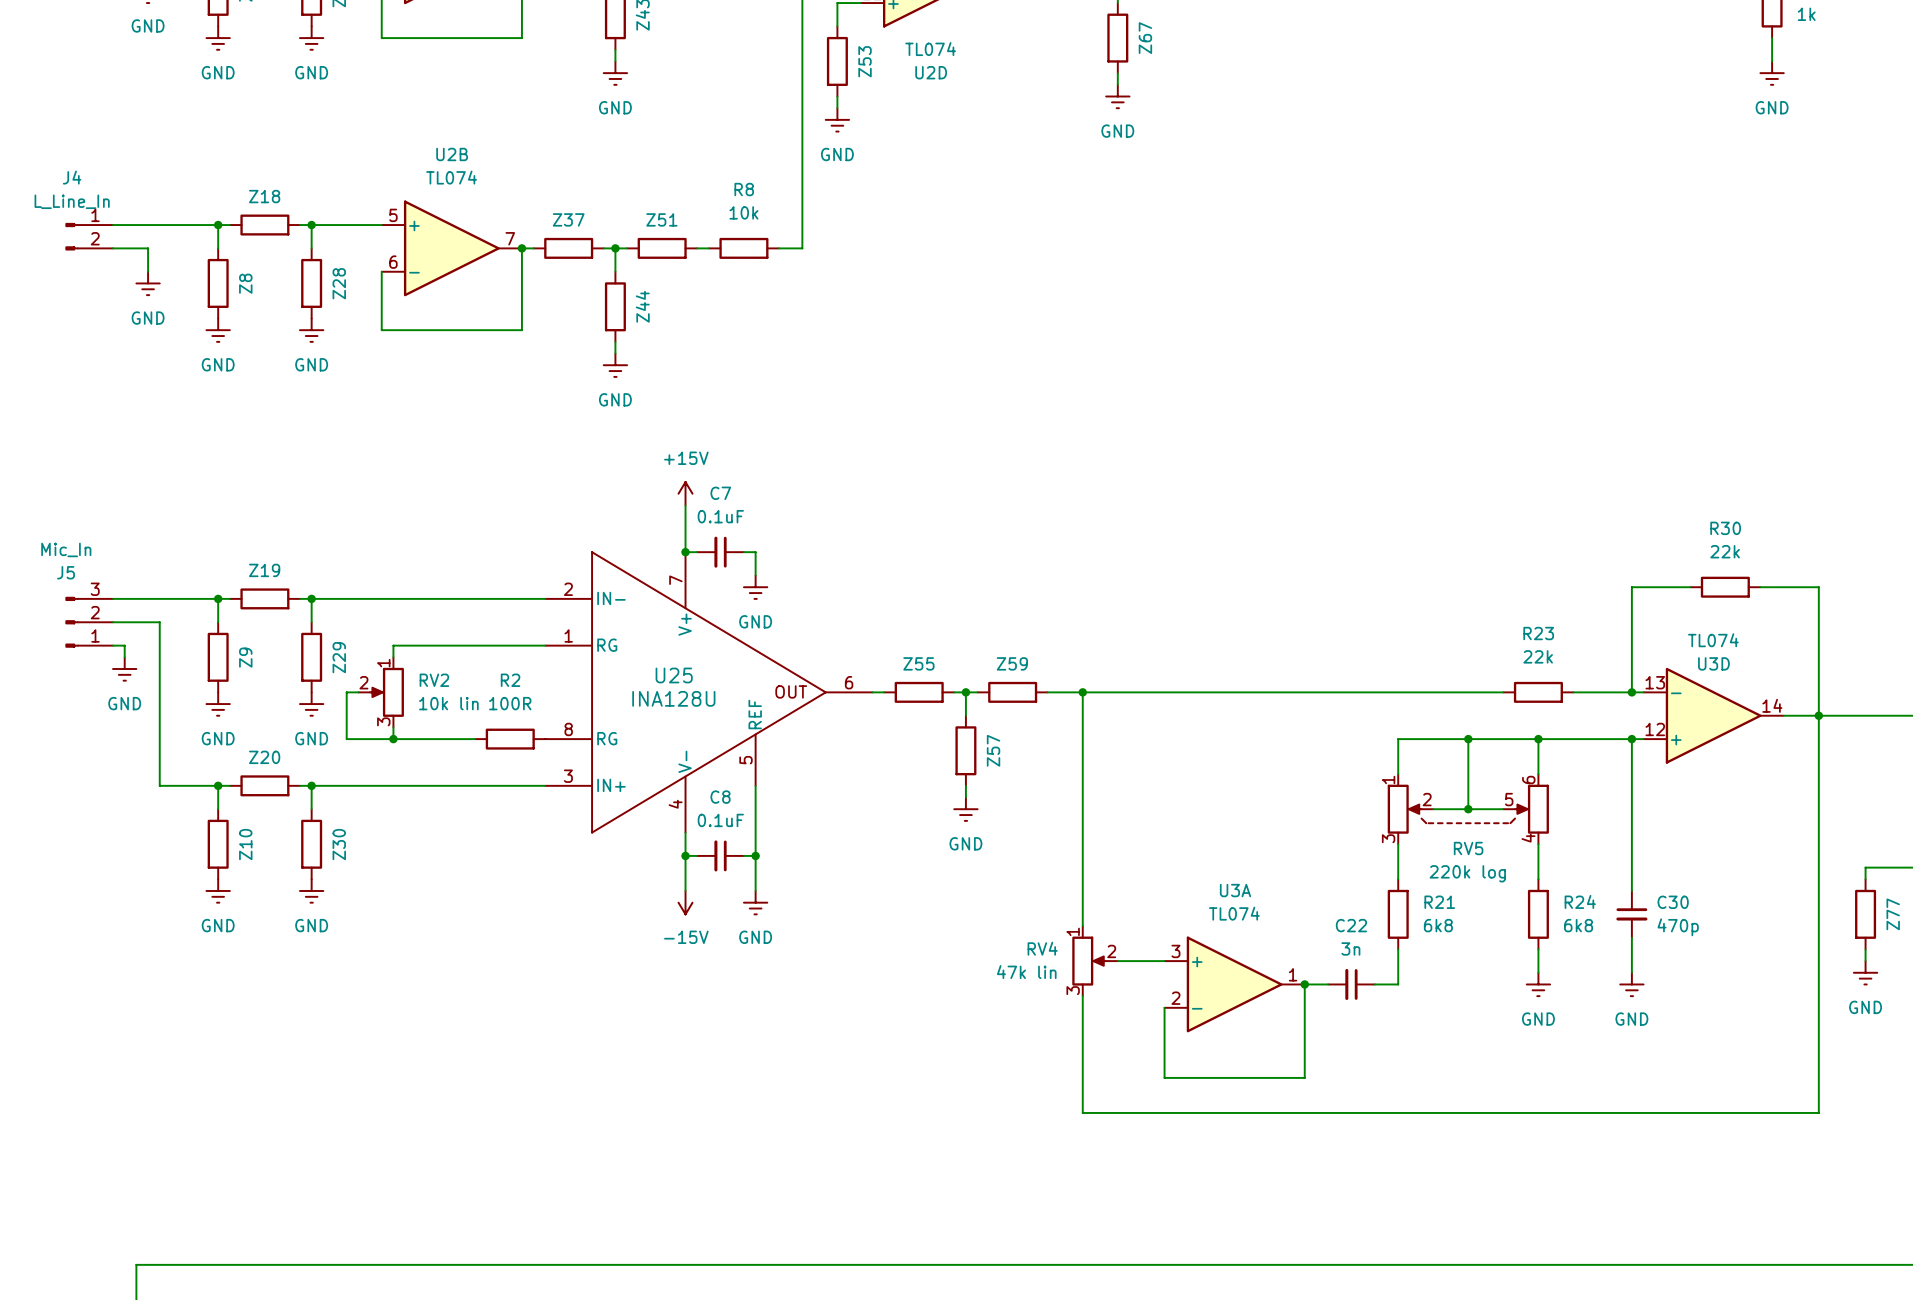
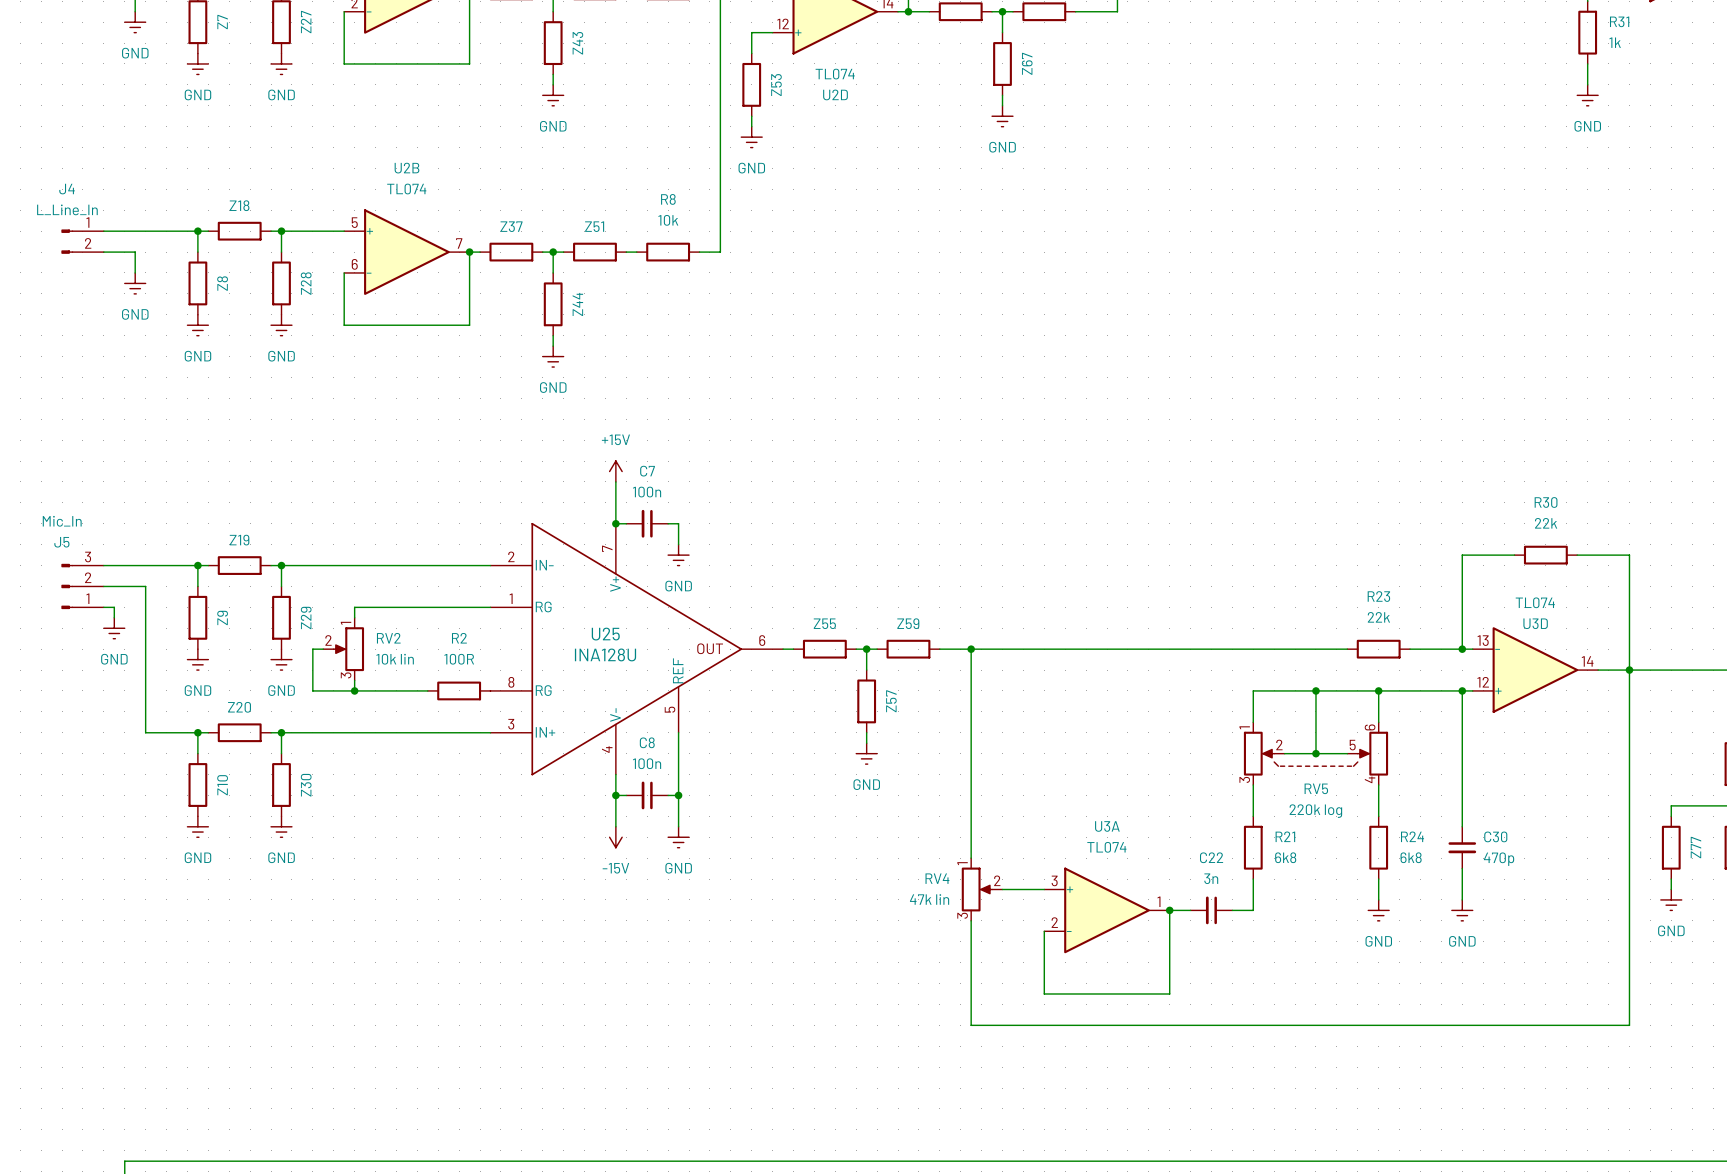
C7 value: 0.1uF (720, 516) -> 100n (647, 492)
C8 value: 0.1uF (720, 820) -> 100n (647, 763)

